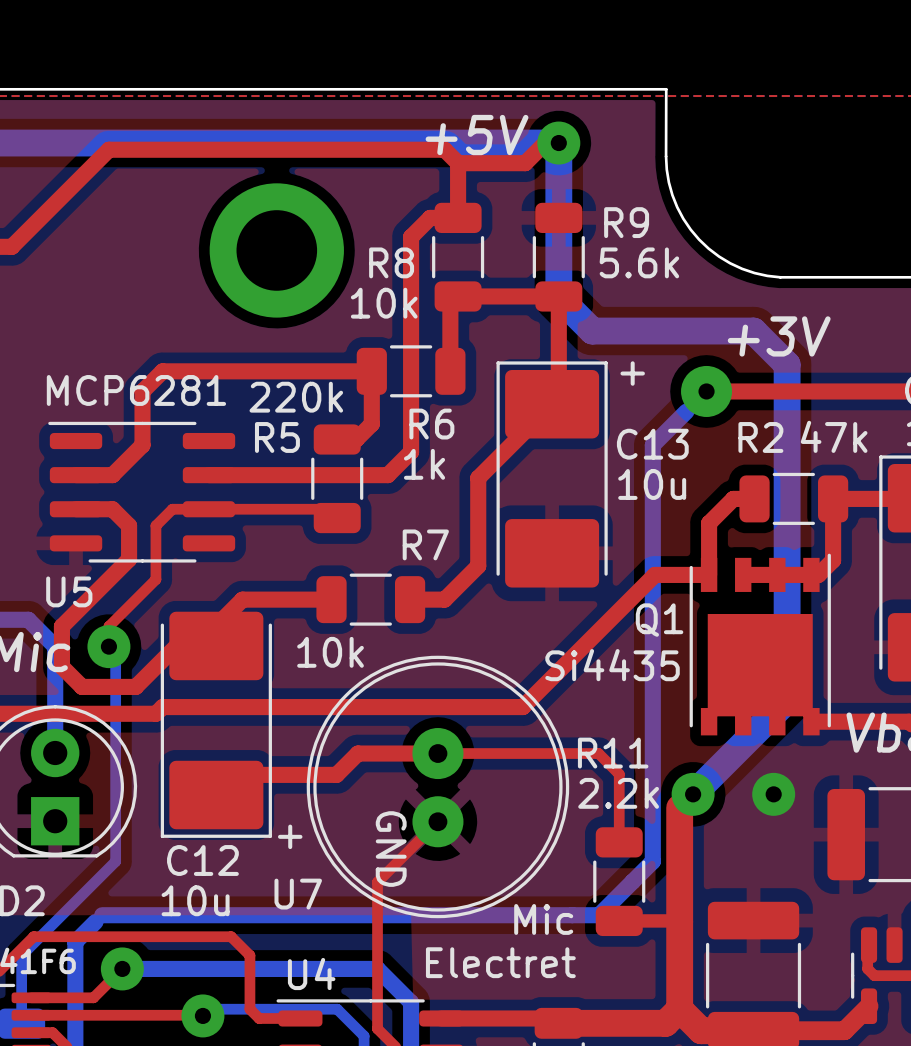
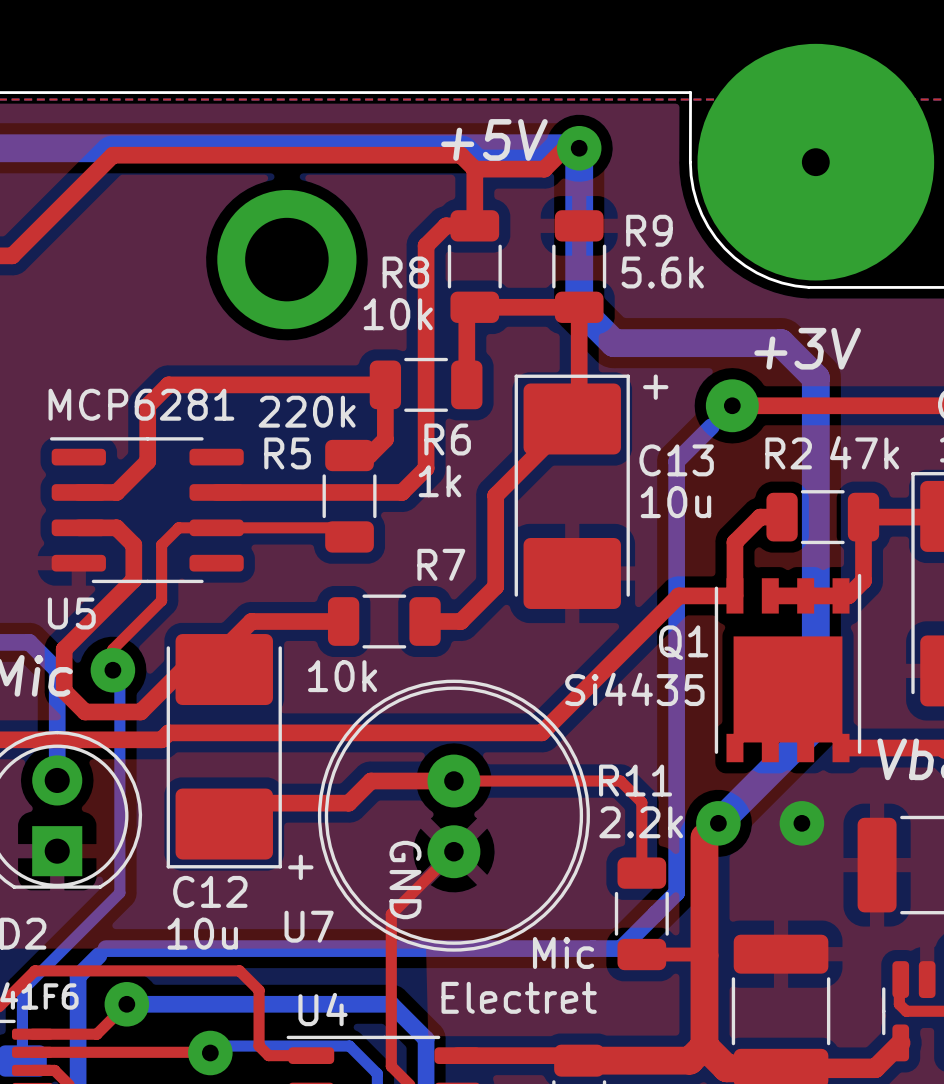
via: none -> (815, 162)

